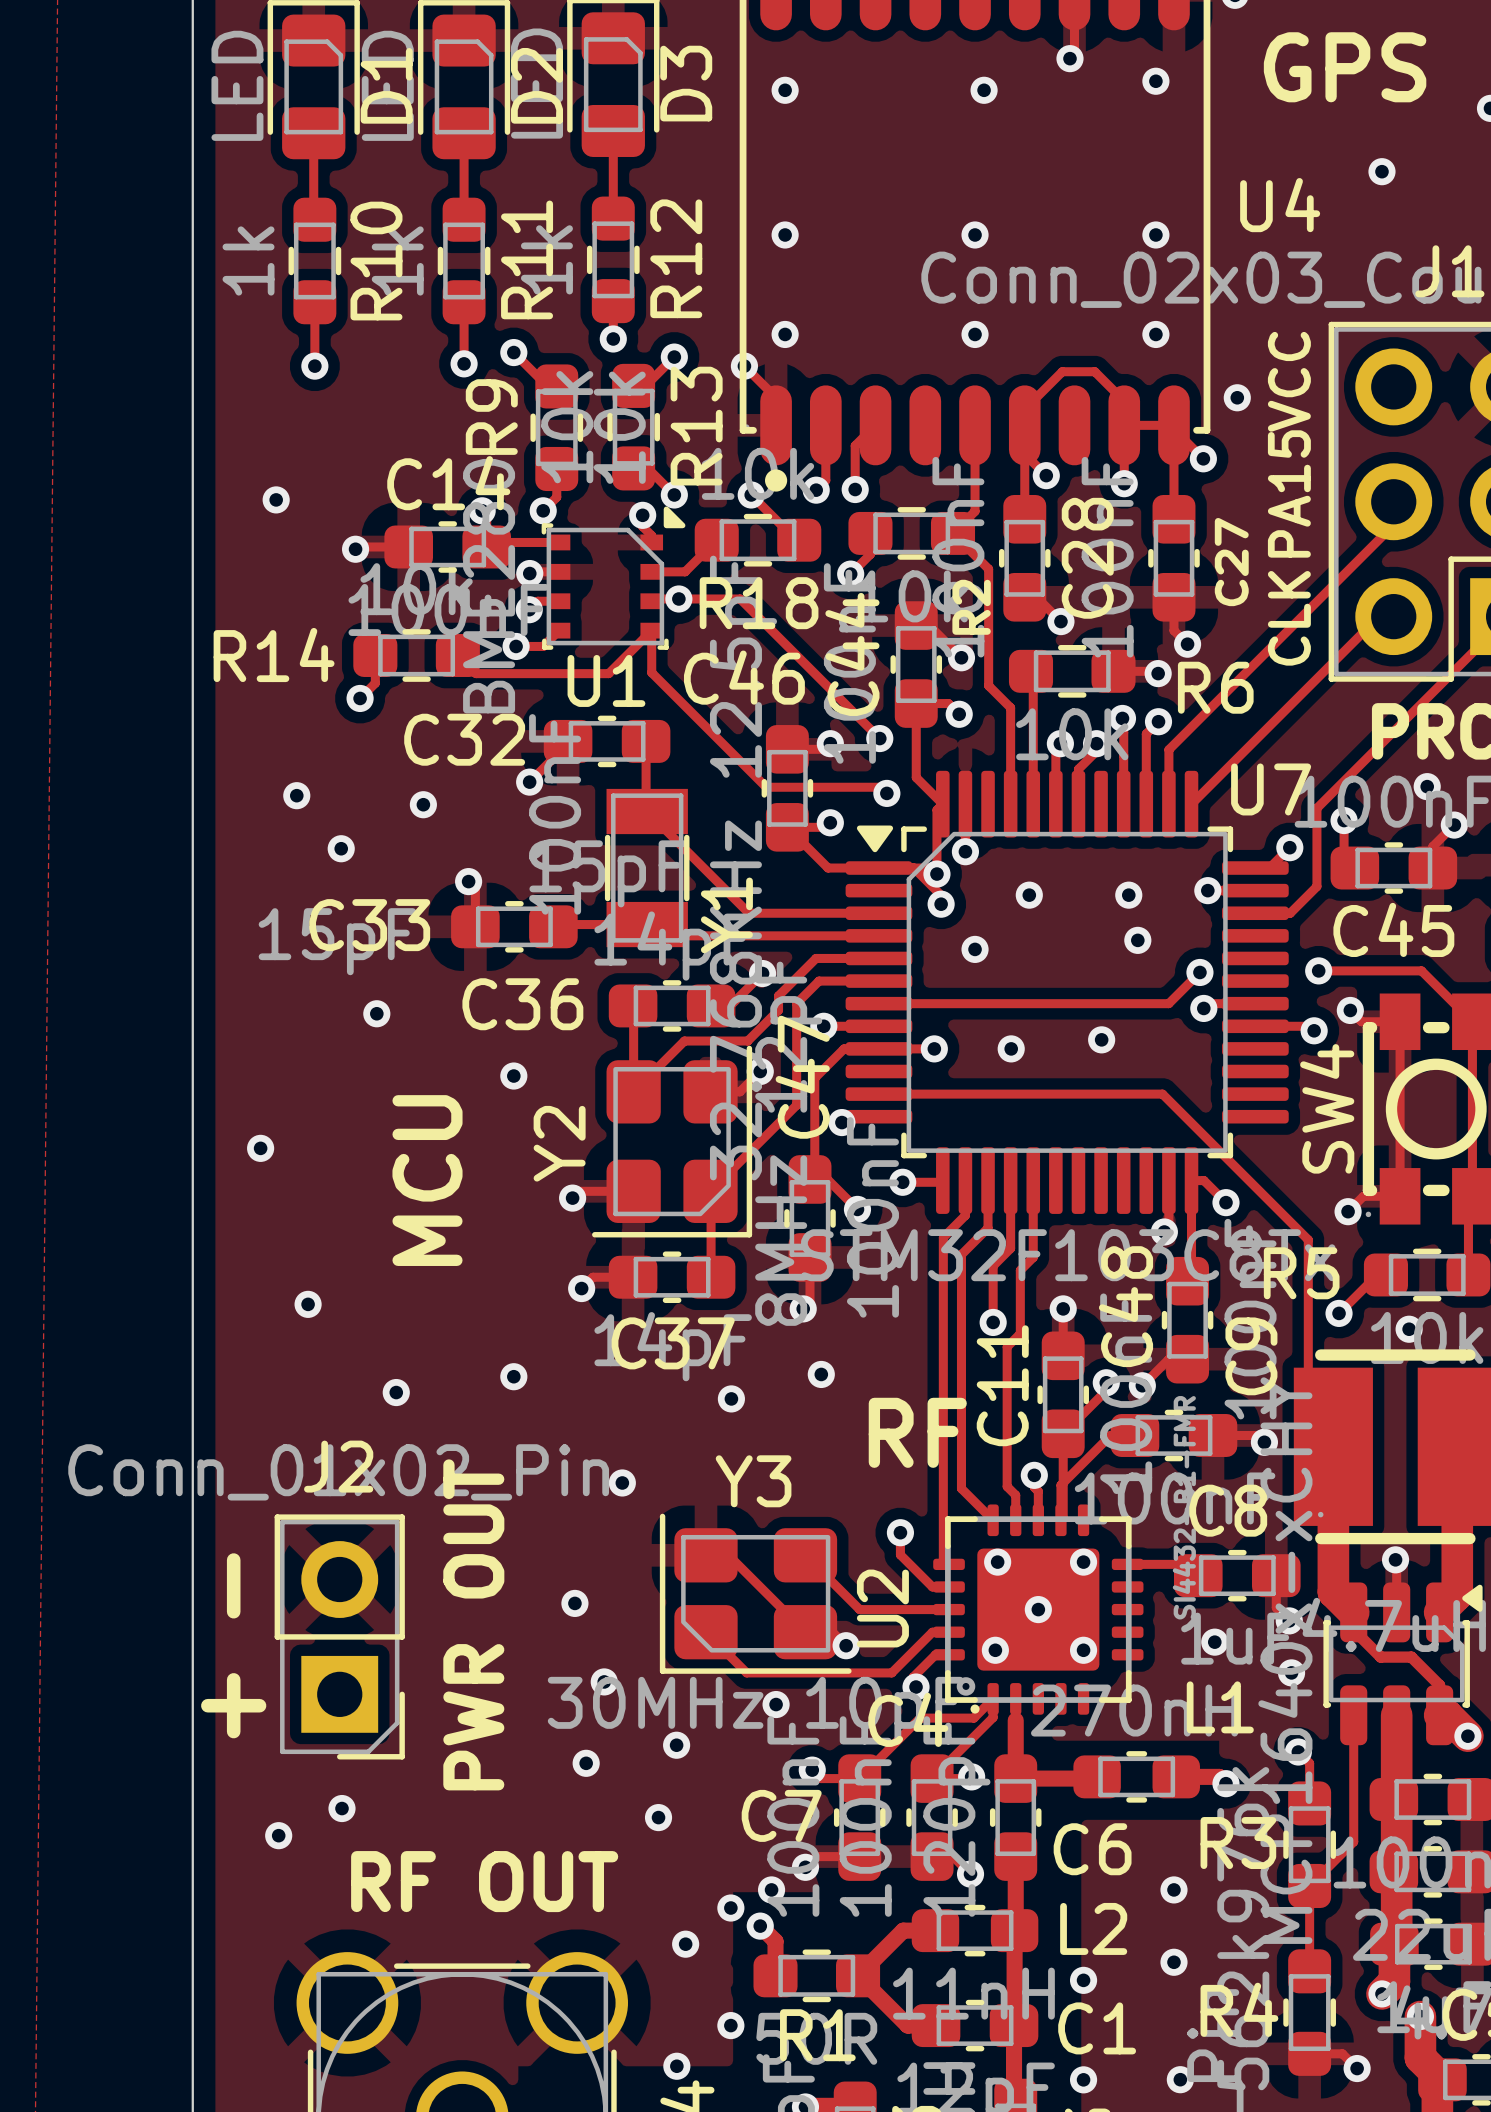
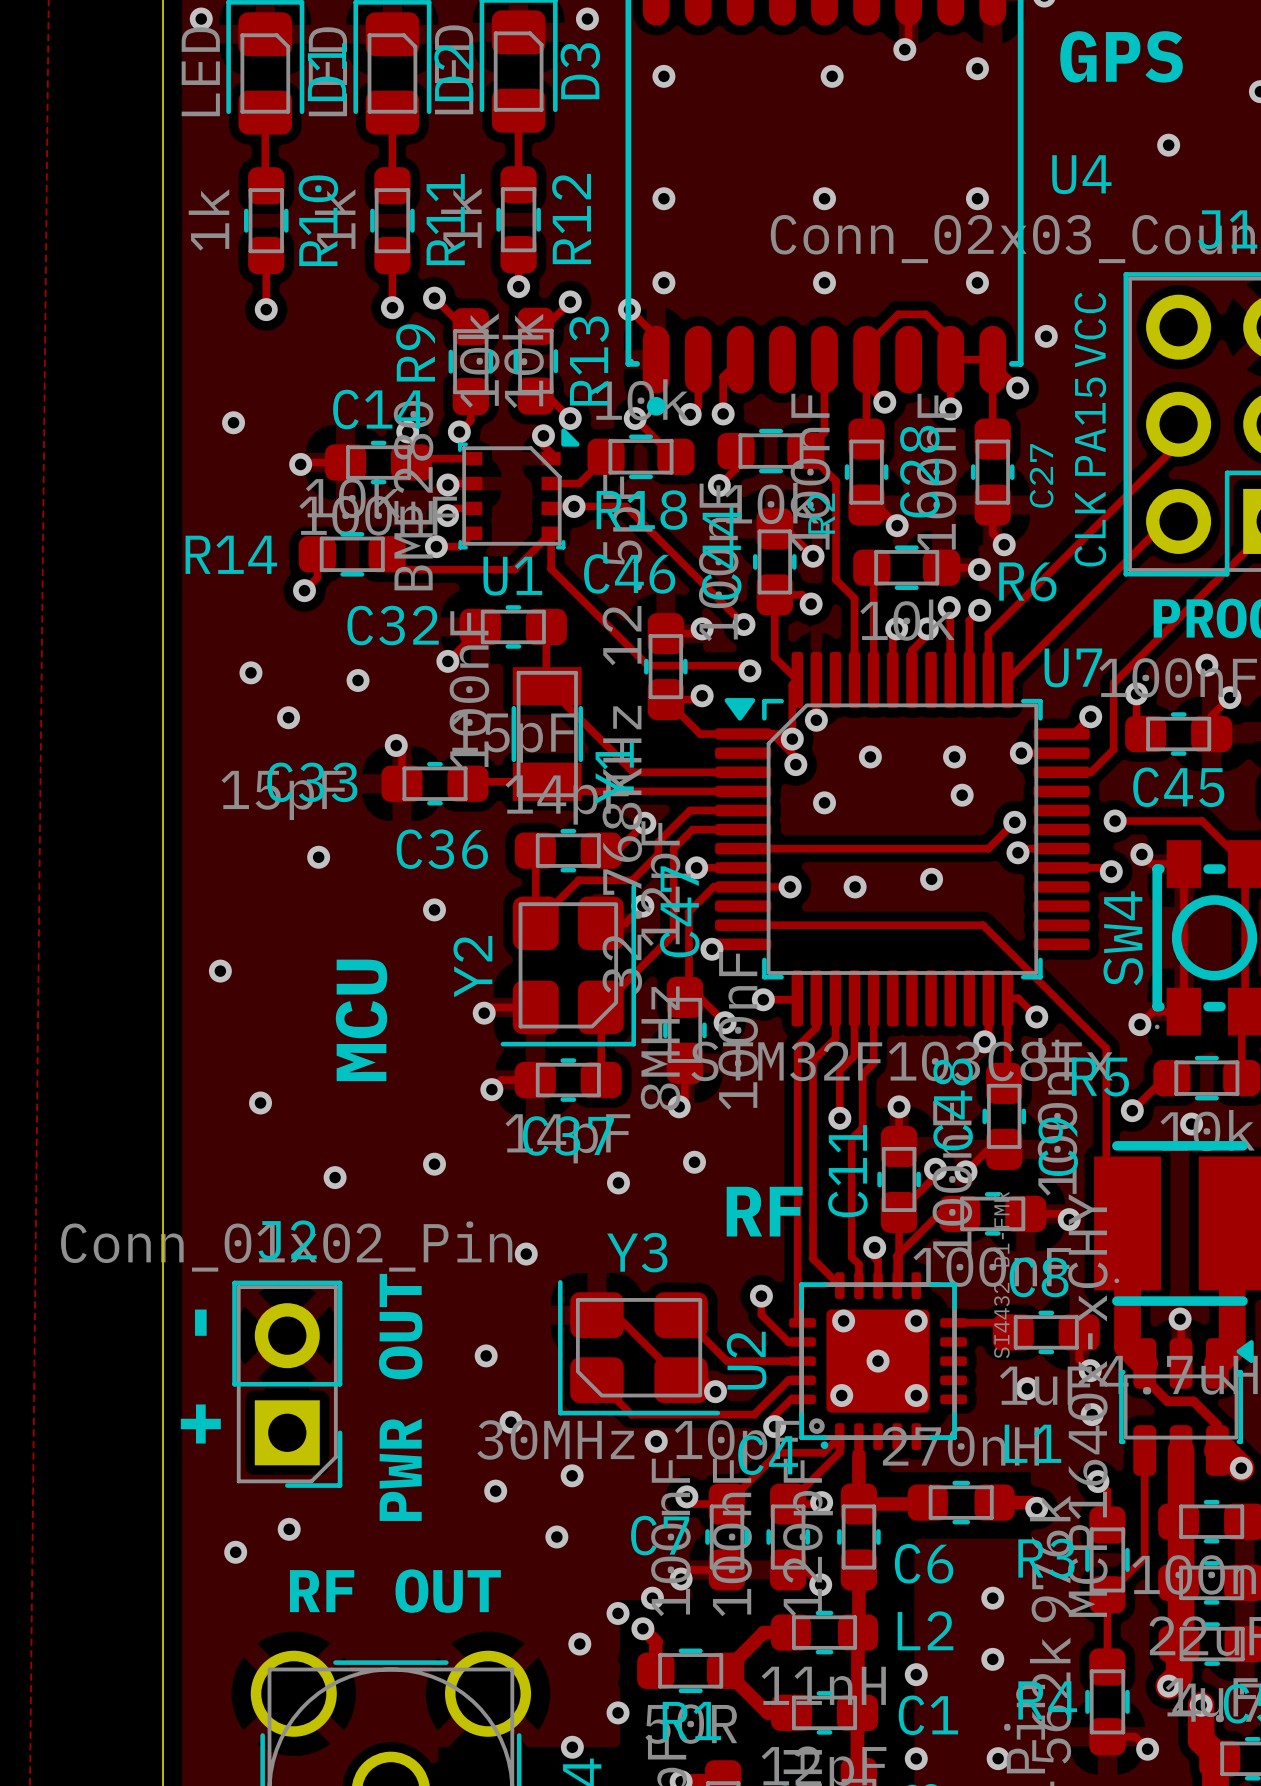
via: none -> (201, 19)
via: none -> (587, 19)

